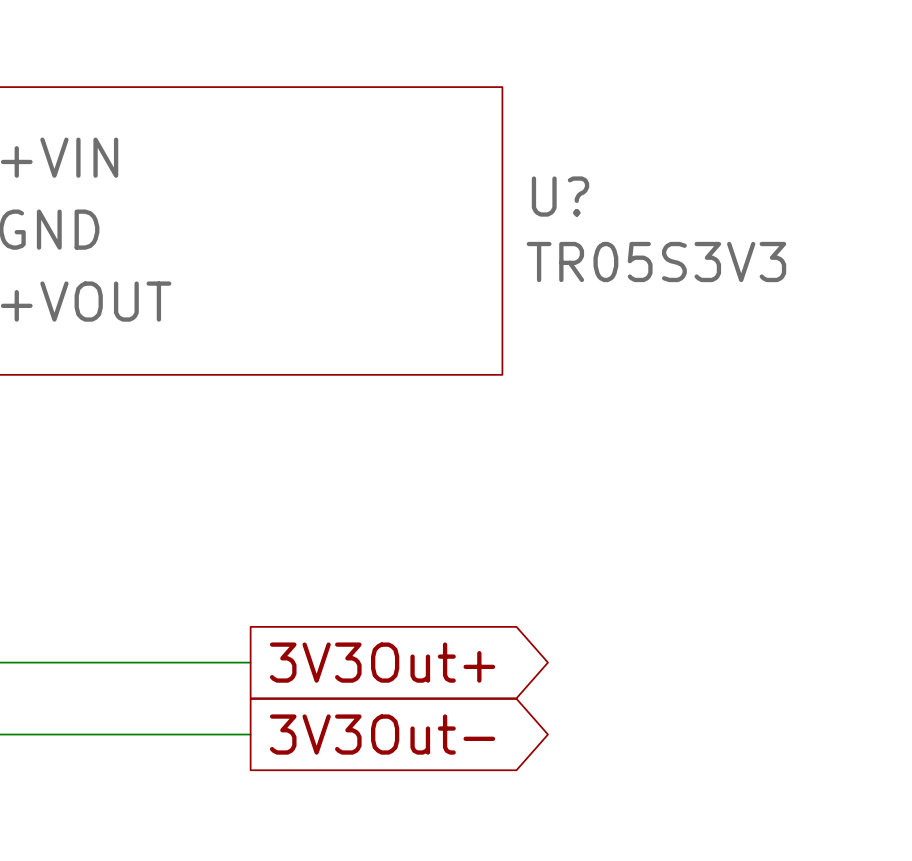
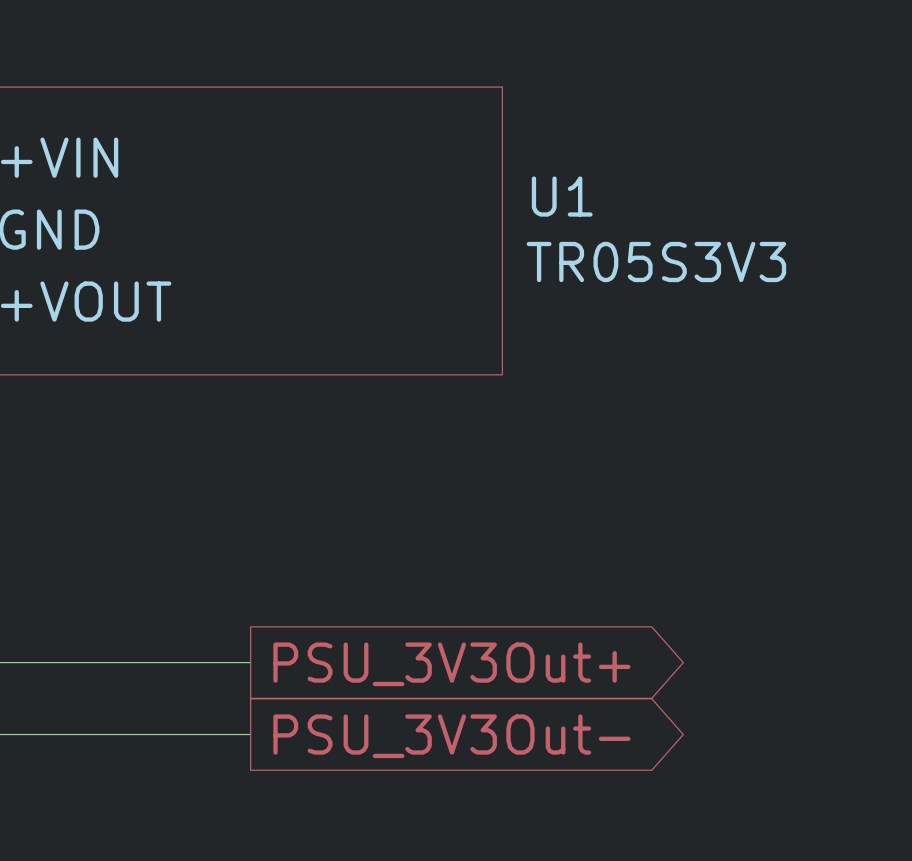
U? name: U? (560, 196) -> U1 (562, 196)
global label: 3V3Out+ (382, 662) -> PSU_3V3Out+ (451, 664)
global label: 3V3Out- (382, 734) -> PSU_3V3Out- (451, 736)

